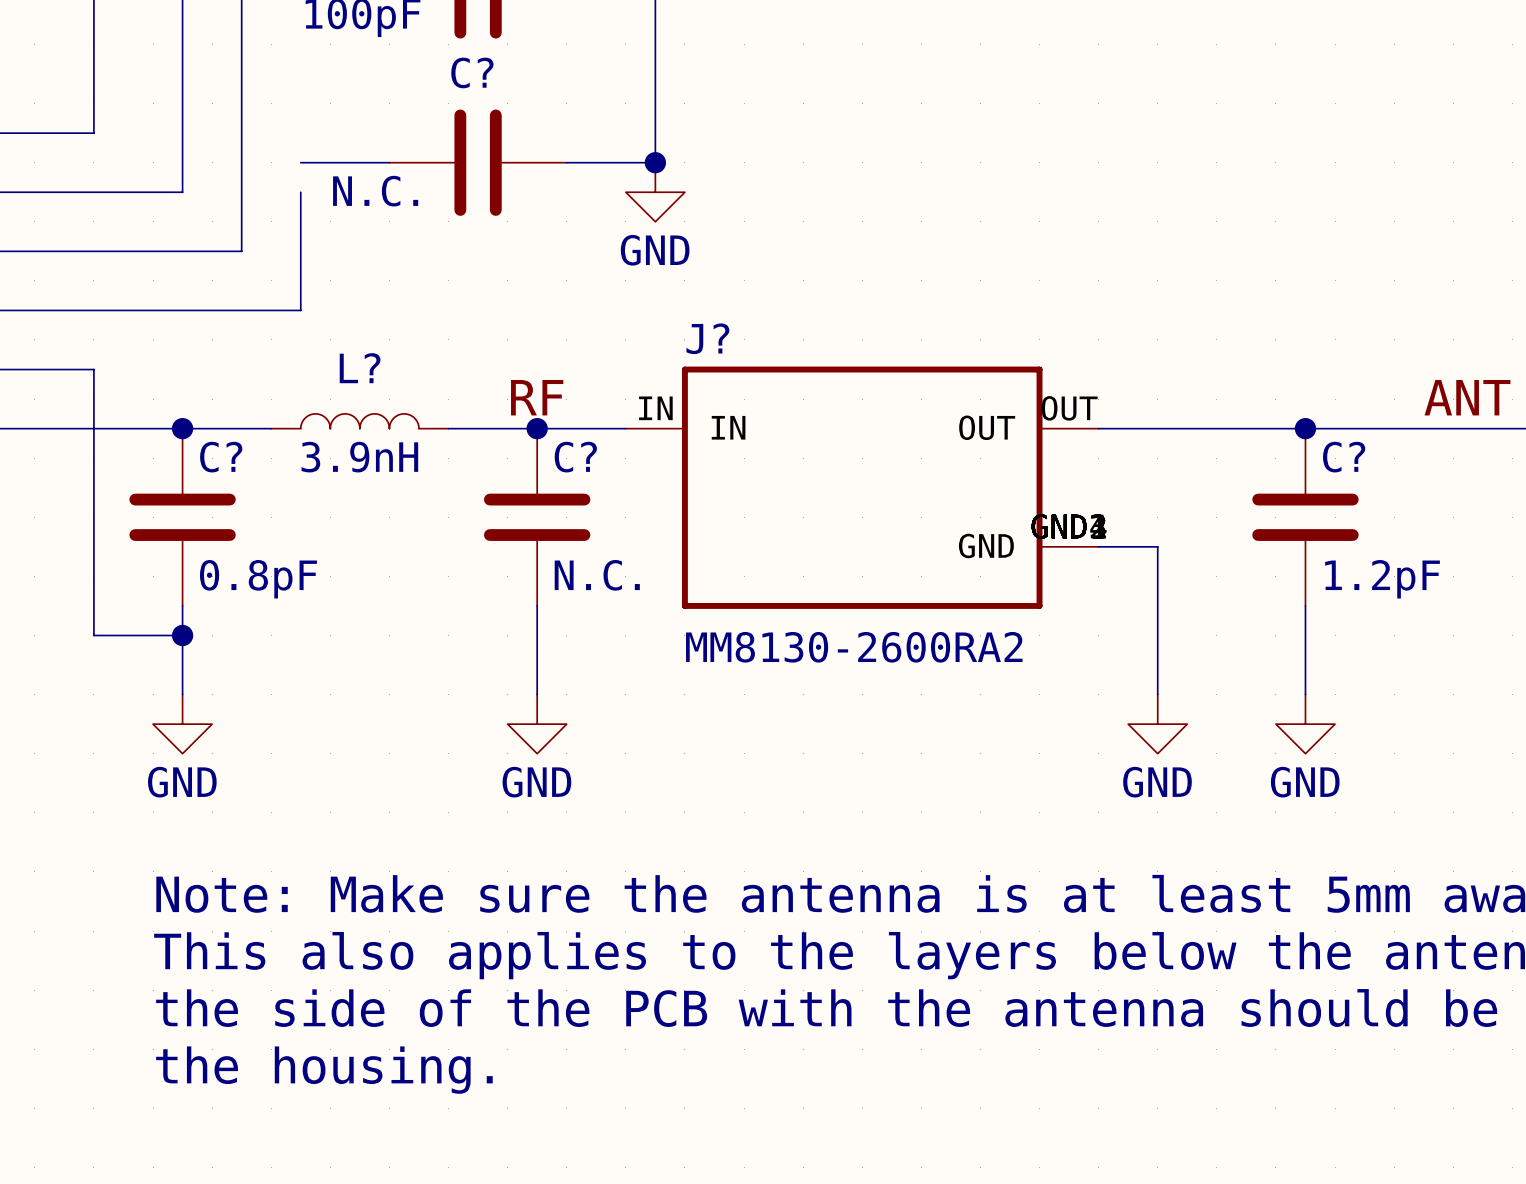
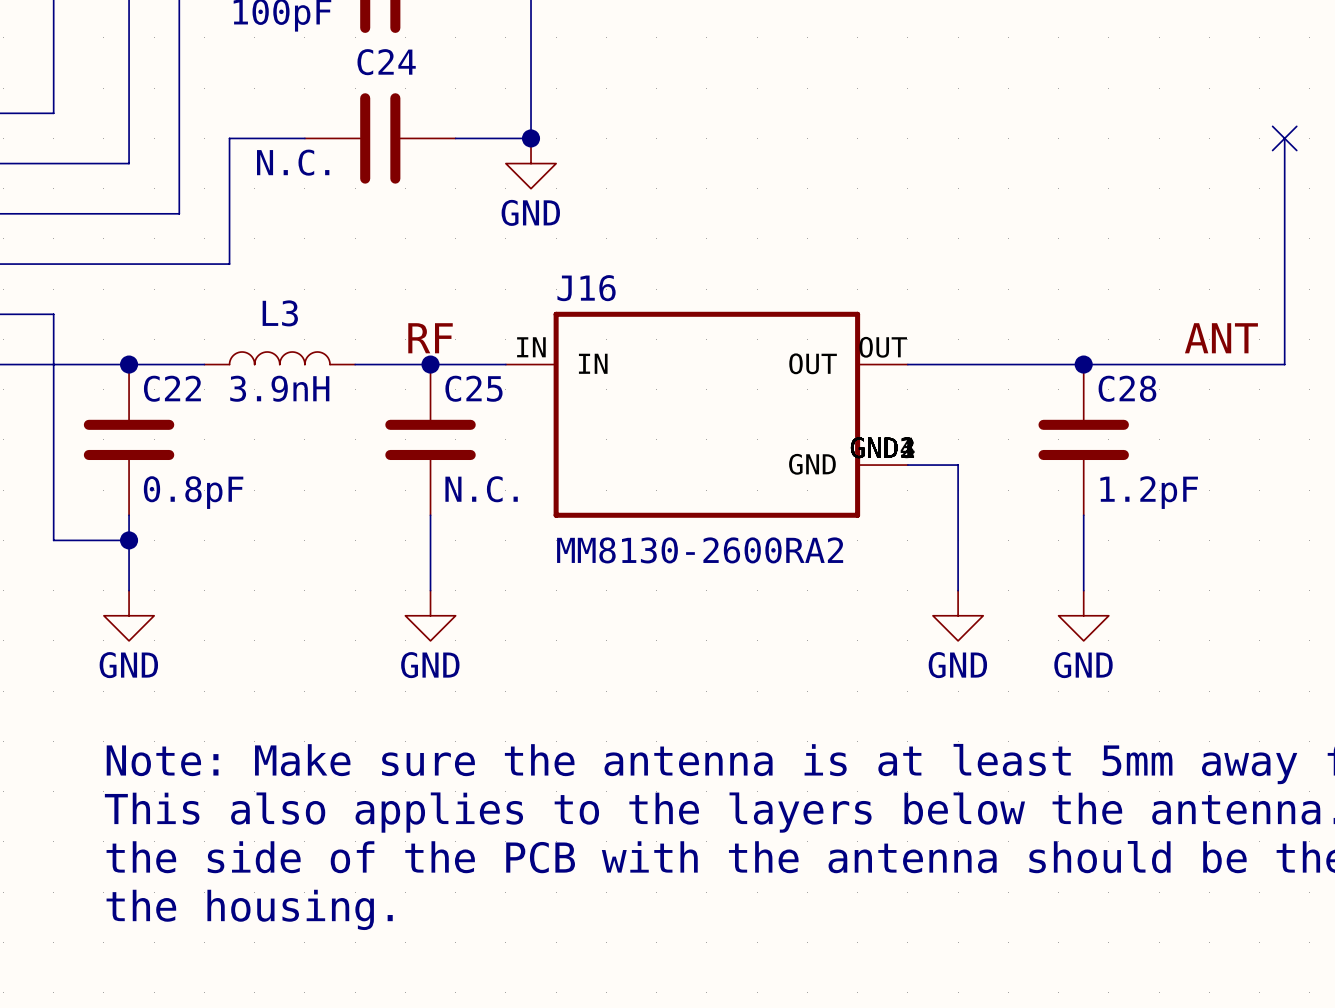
C? name: C? (472, 72) -> C24 (386, 62)
wire: none -> (229, 138) (229, 163)
J? name: J? (707, 338) -> J16 (586, 288)
L? name: L? (360, 368) -> L3 (280, 313)
C? name: C? (221, 457) -> C22 (172, 388)
C? name: C? (575, 457) -> C25 (473, 388)
C? name: C? (1344, 457) -> C28 (1127, 388)

